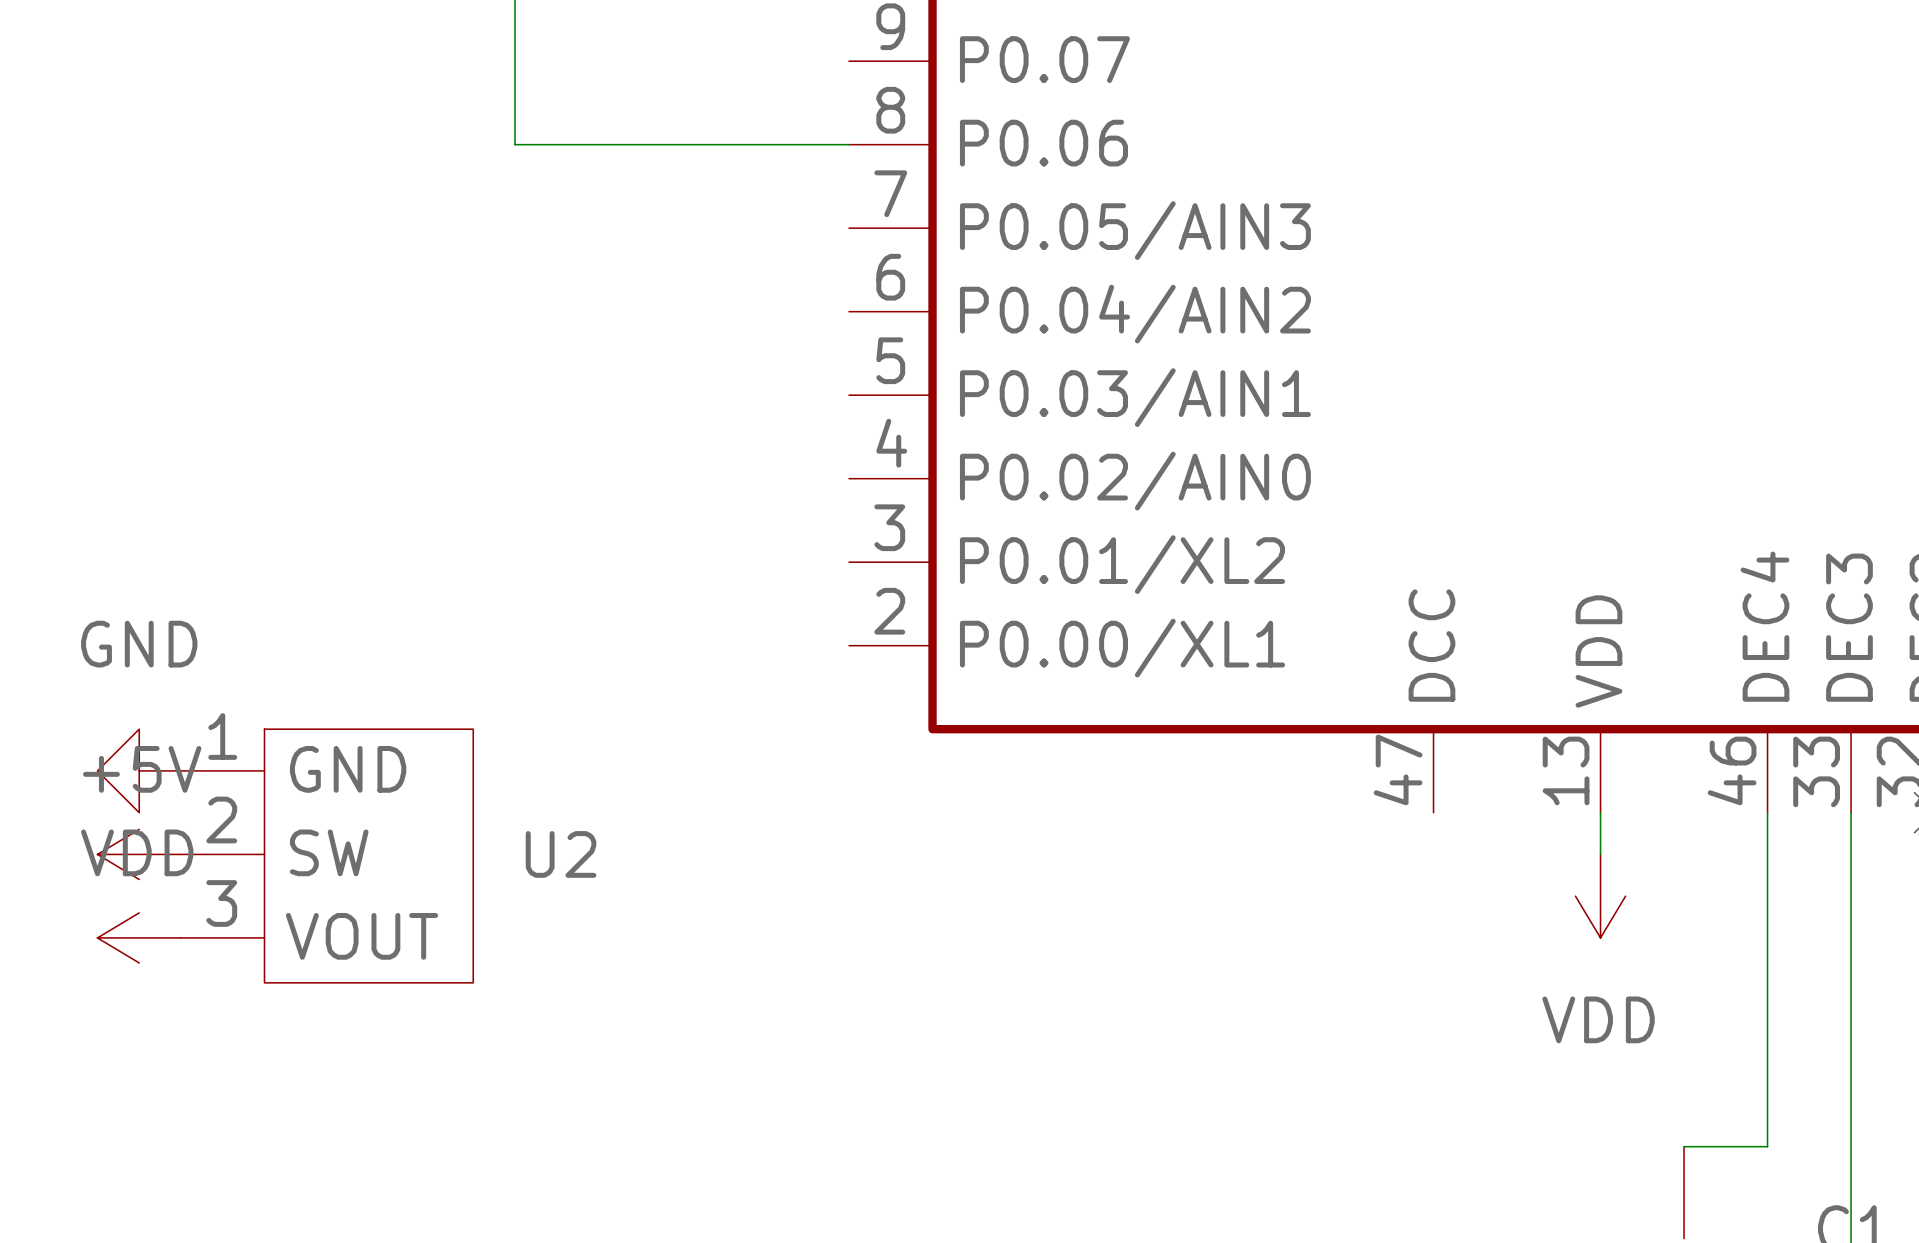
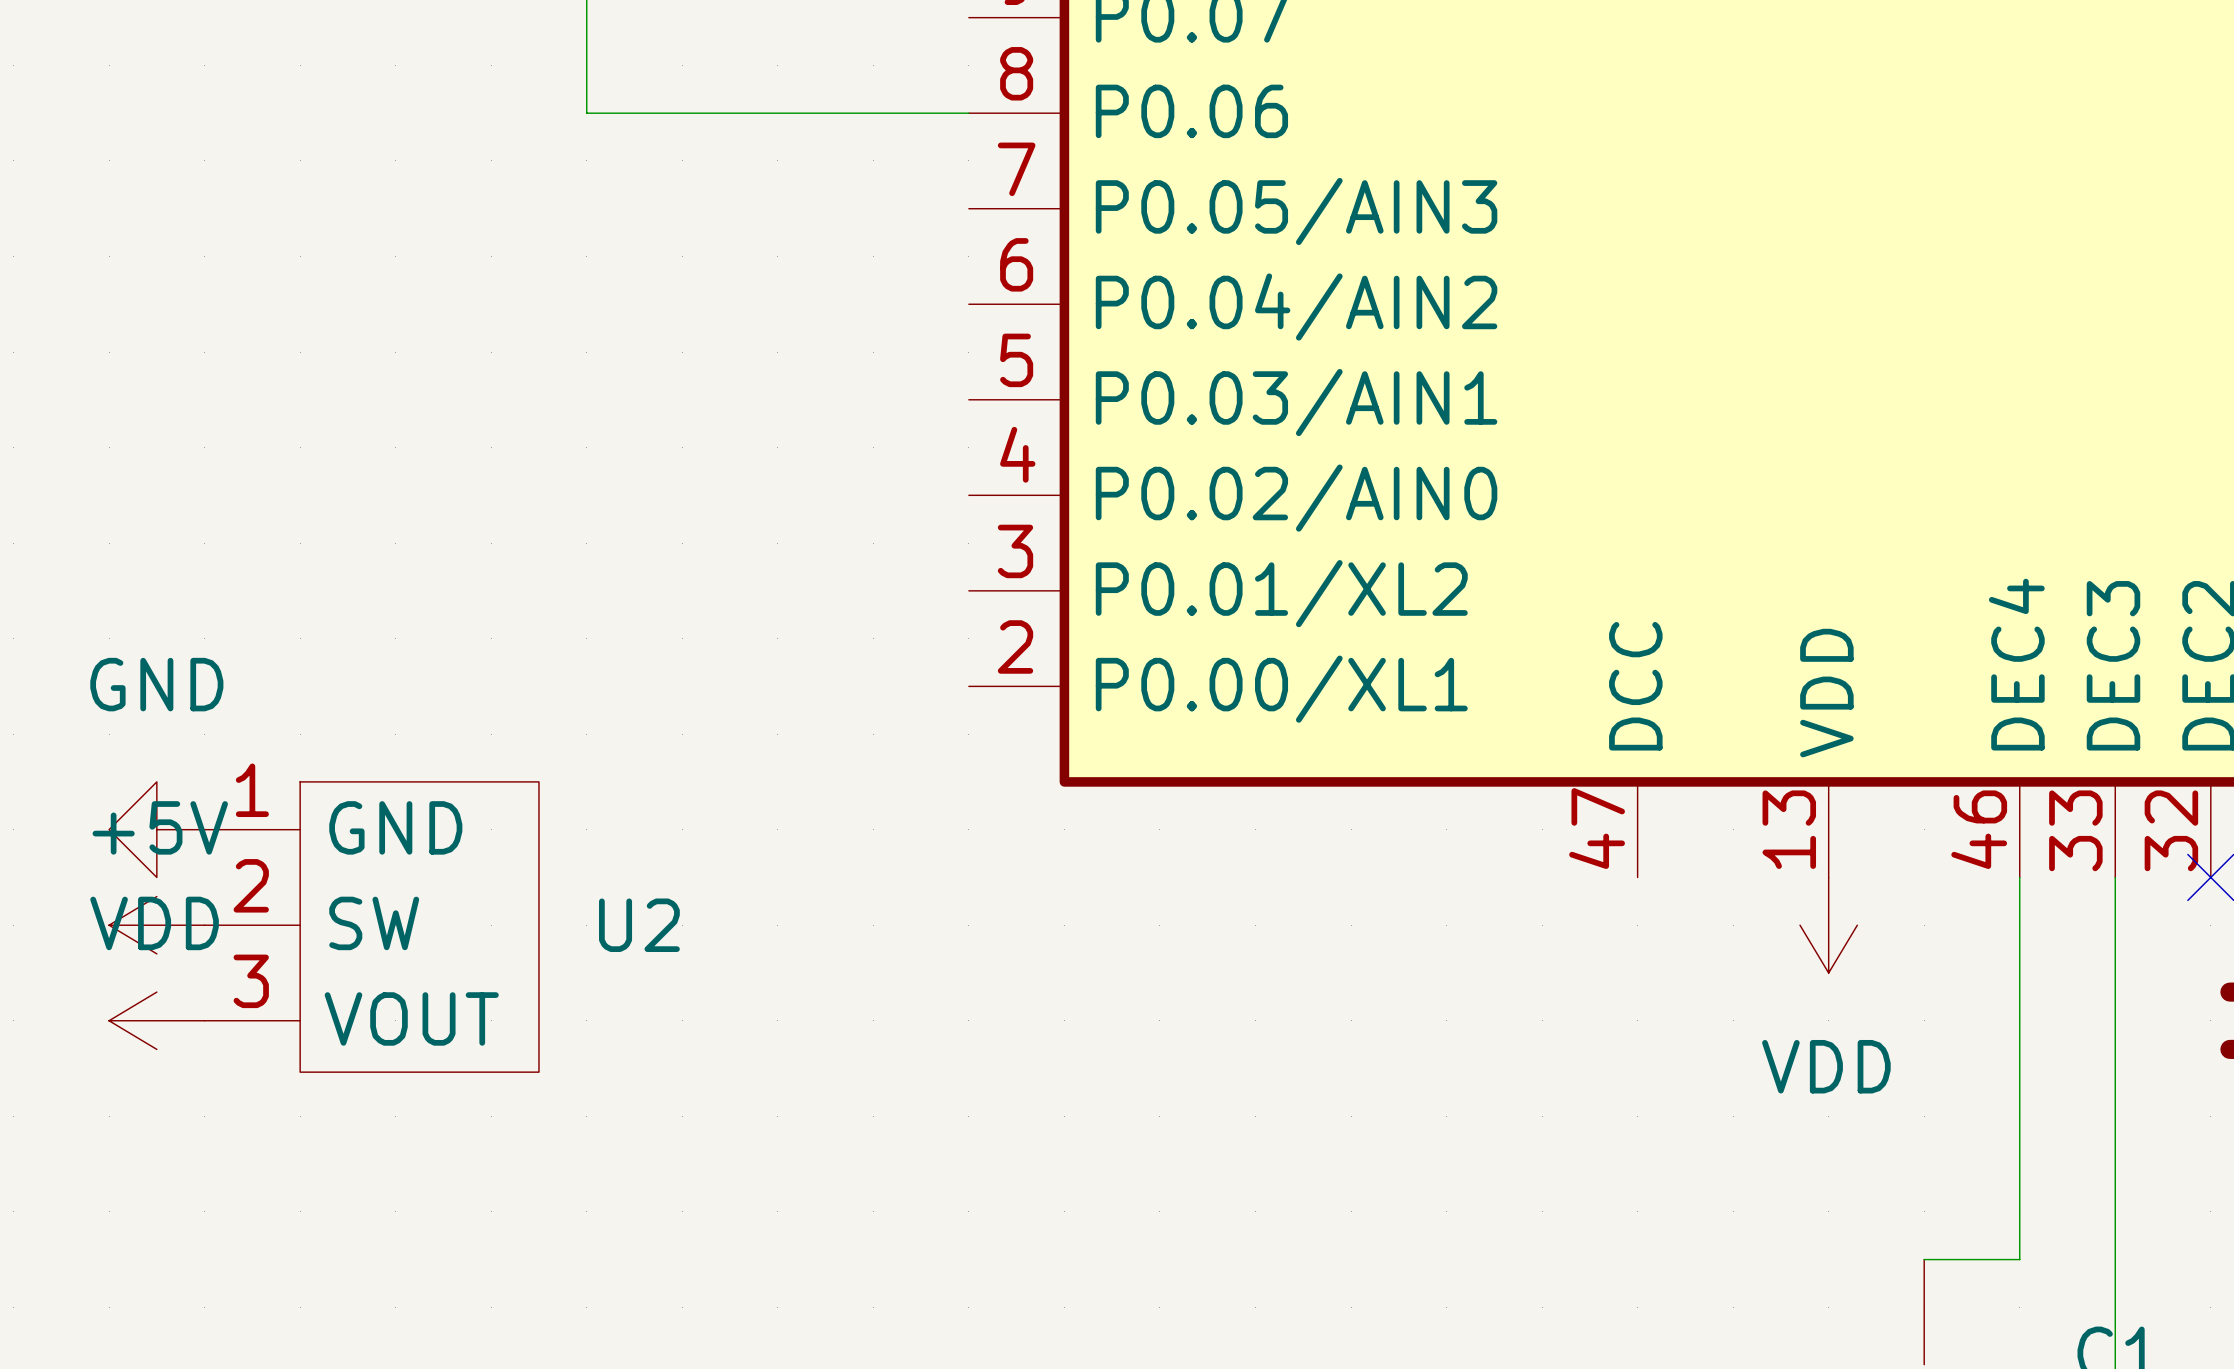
power symbol position: VDD (1600, 896) -> VDD (1828, 925)

